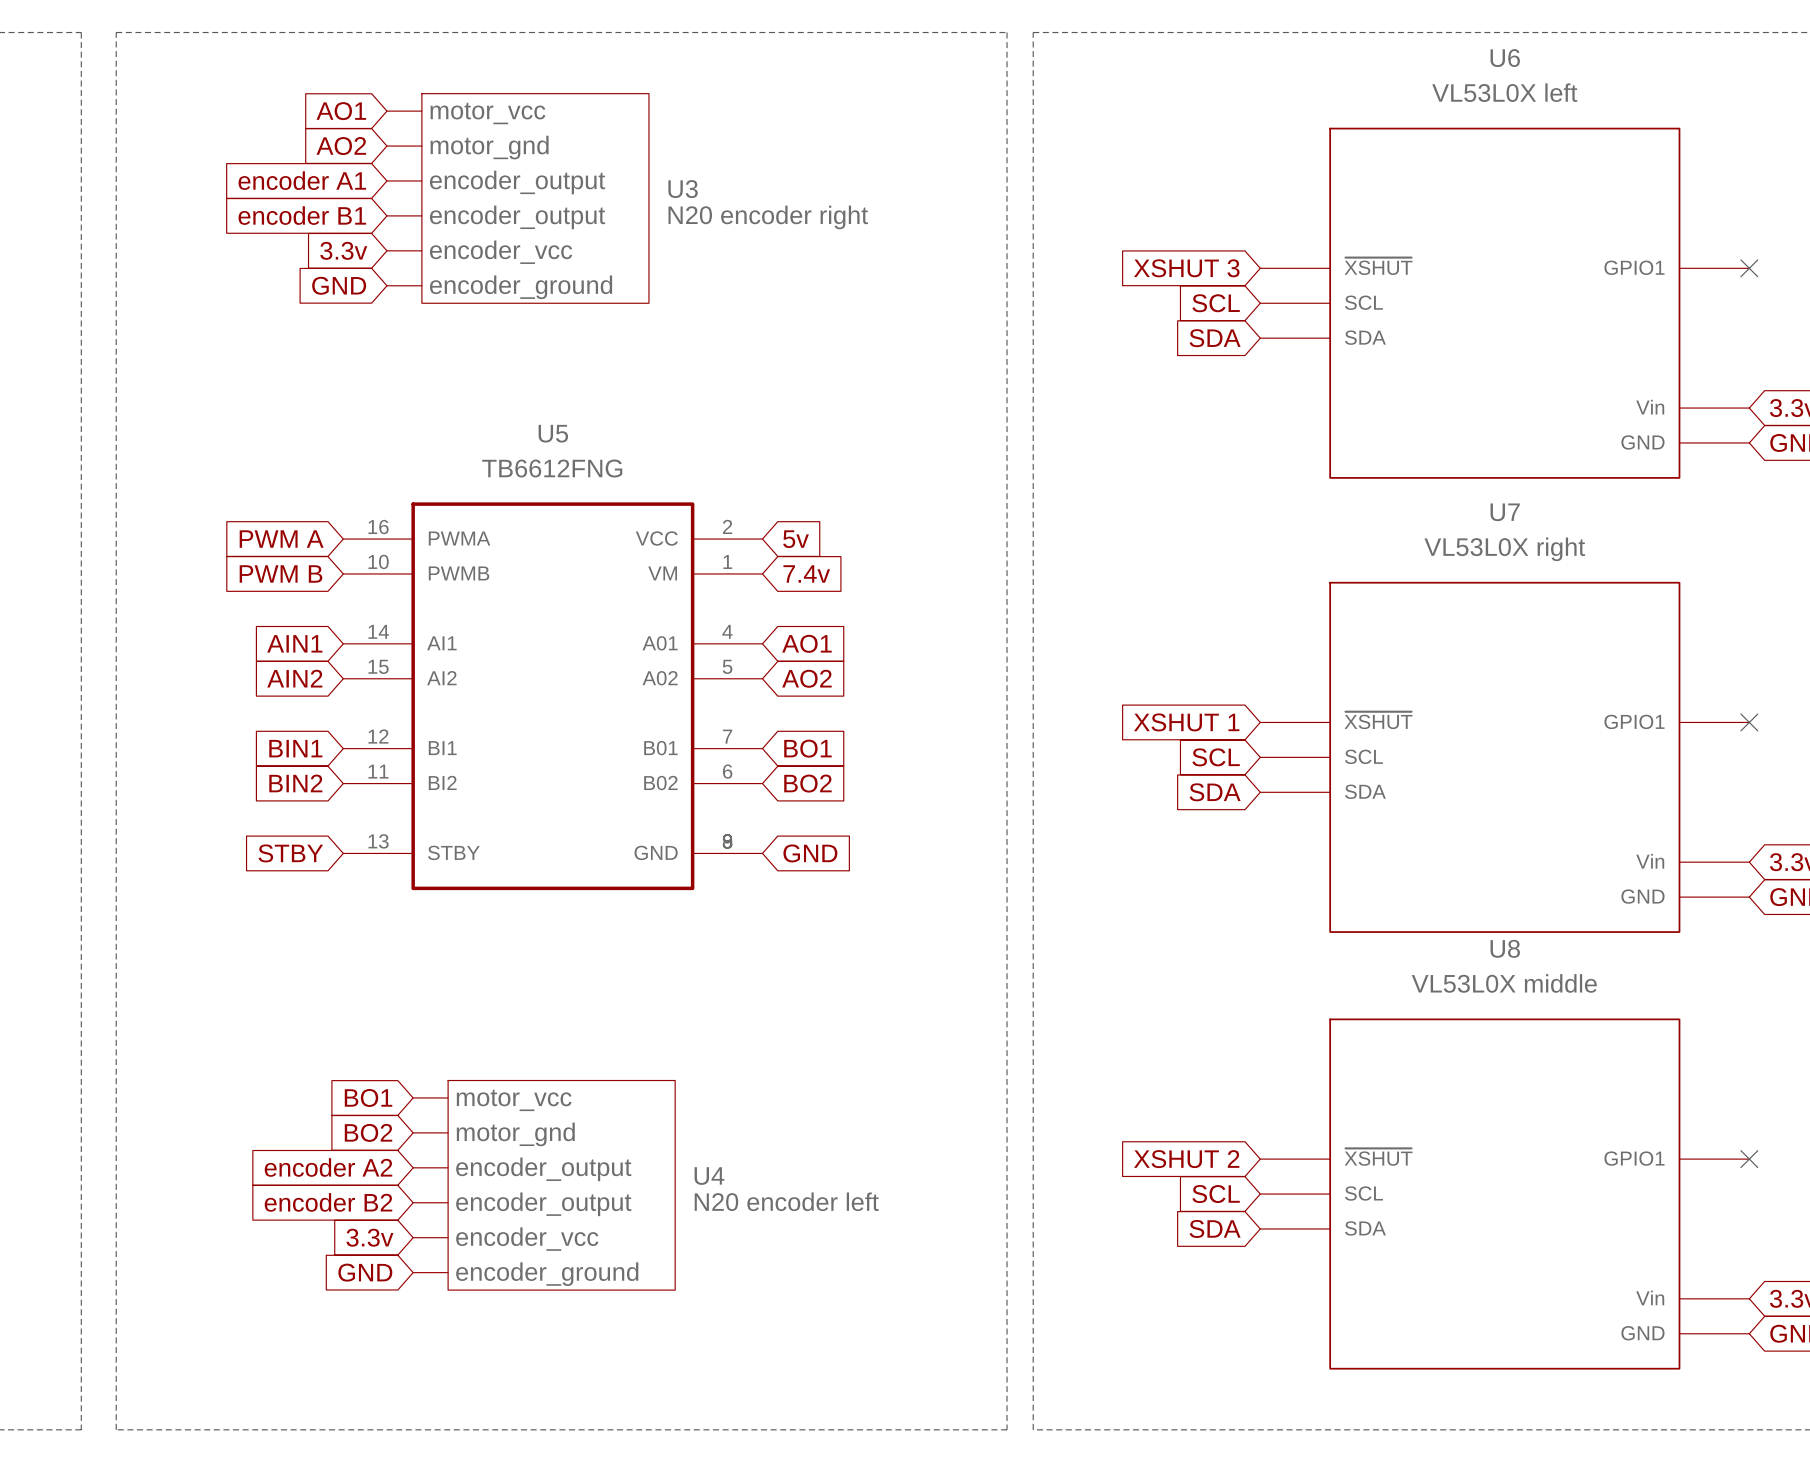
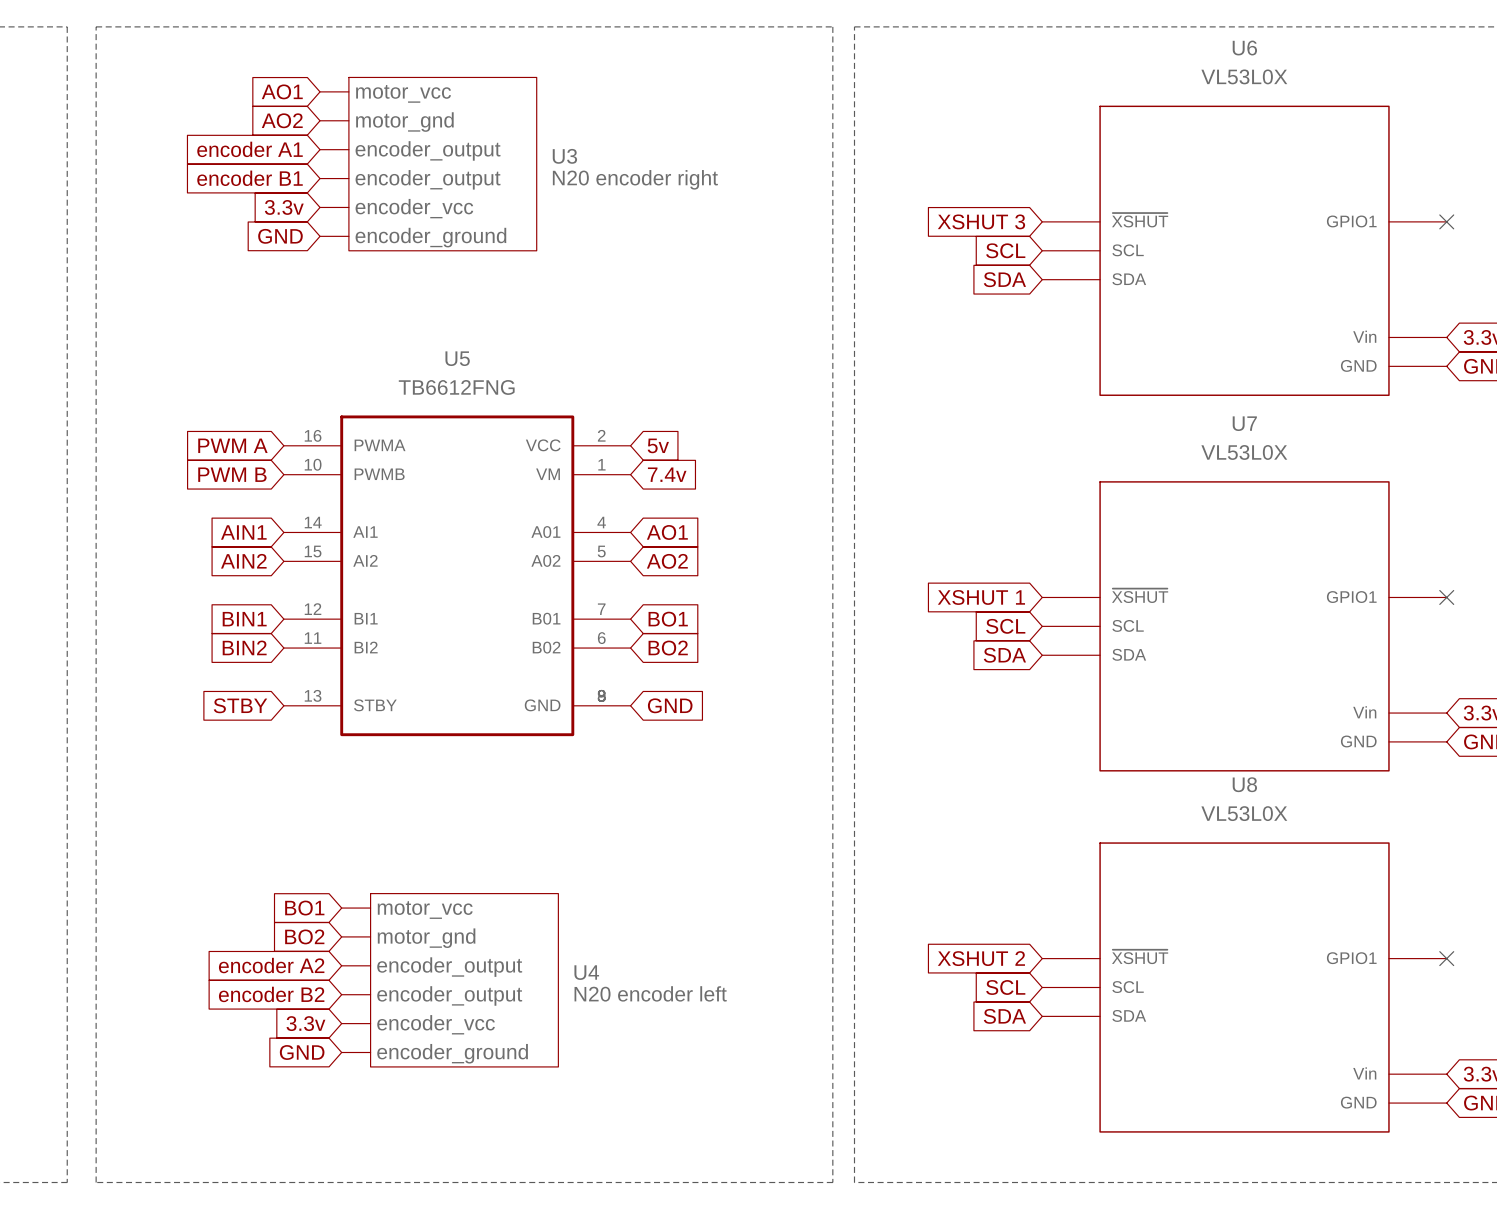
U6 value: VL53L0X left (1504, 92) -> VL53L0X (1244, 76)
U7 value: VL53L0X right (1504, 549) -> VL53L0X (1244, 452)
U8 value: VL53L0X middle (1504, 983) -> VL53L0X (1244, 813)

